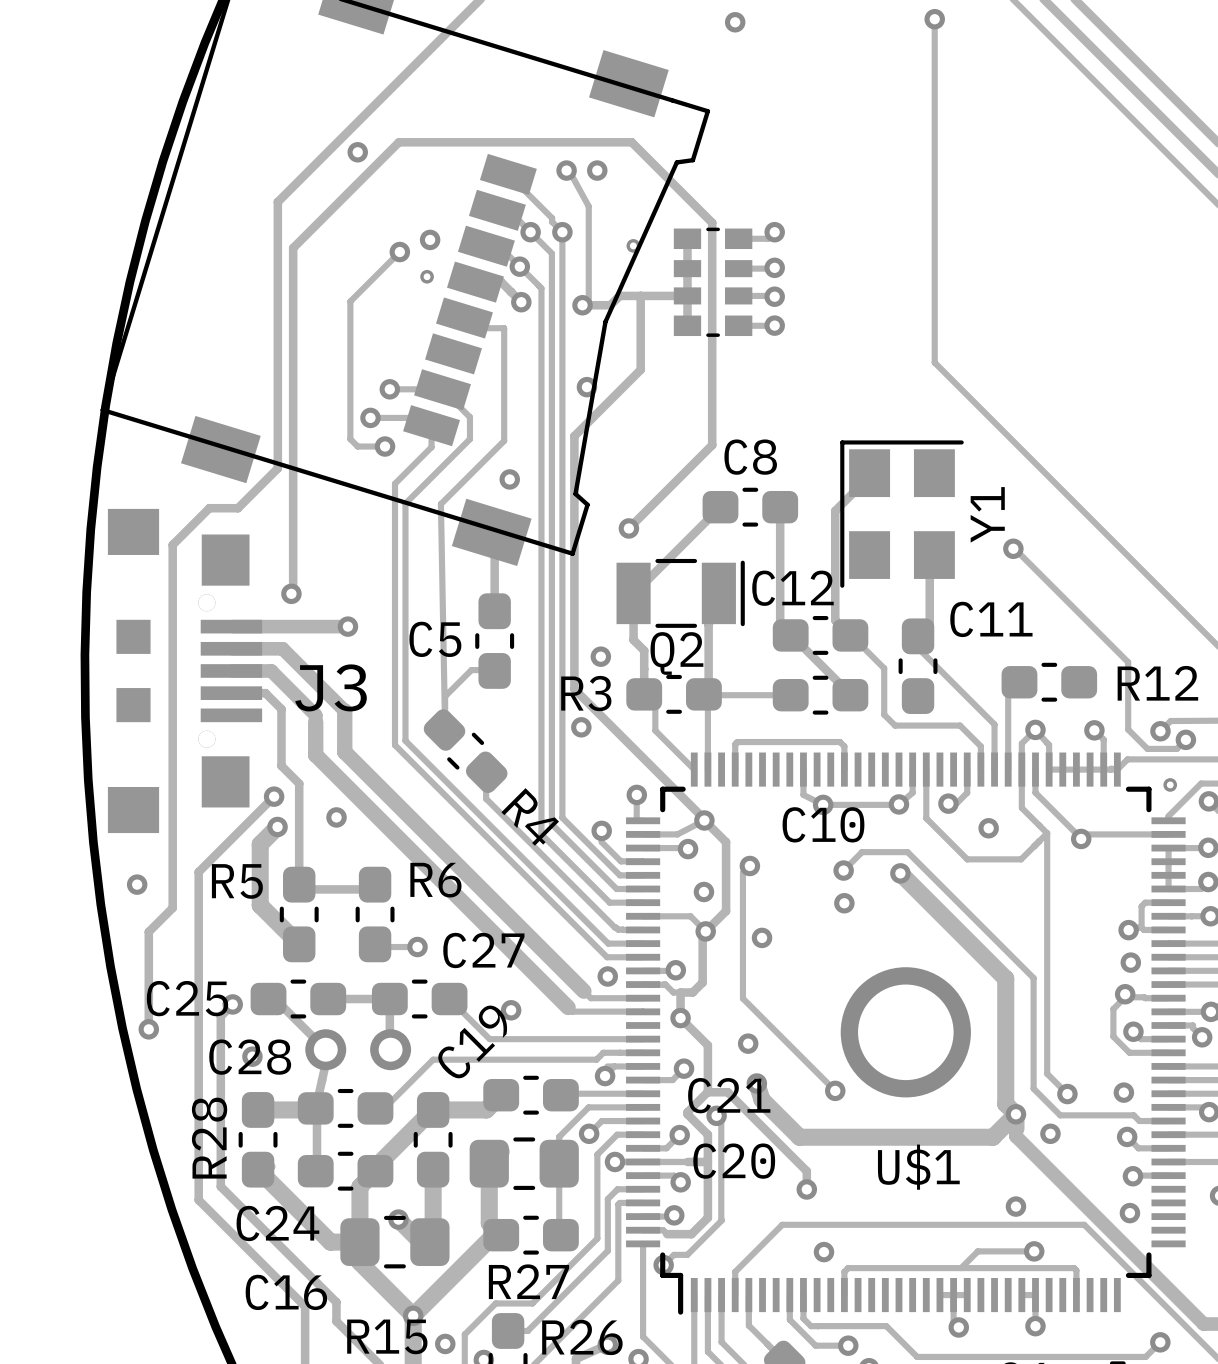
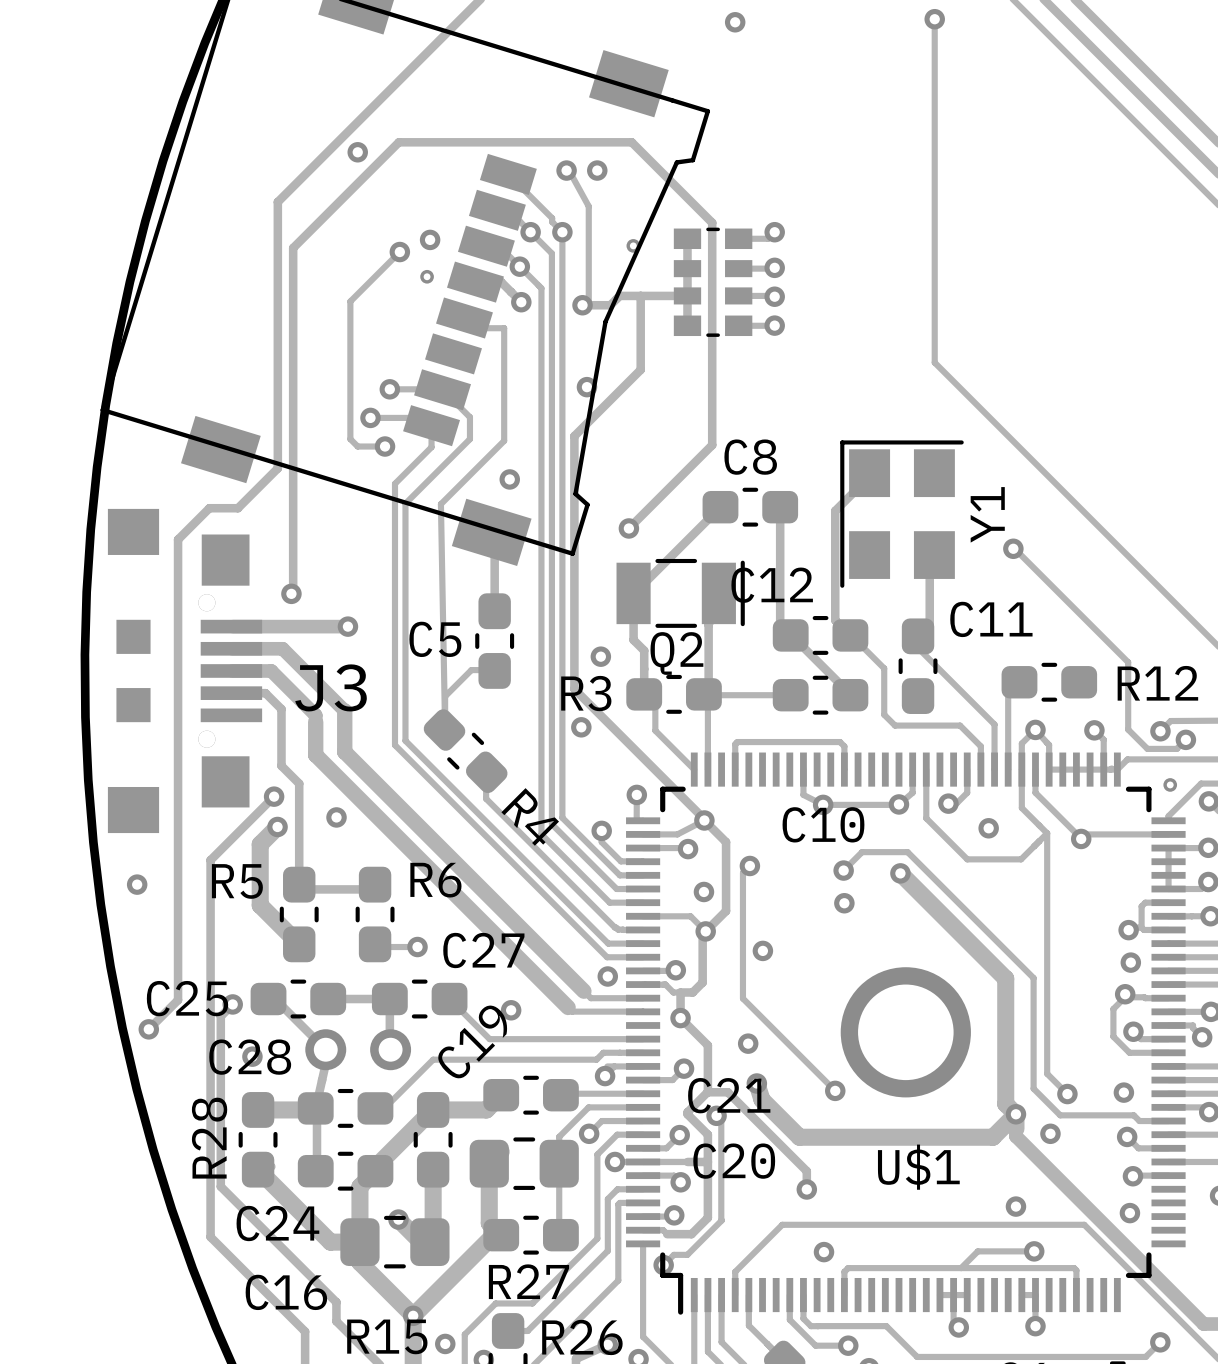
track: (209, 508) (172, 544) (172, 908) (148, 931) (148, 1029) -> (209, 508) (178, 539) (178, 1000) (148, 1029)
C12 name position: C12 (792, 588) -> C12 (772, 585)
track: (210, 860) (198, 872) (198, 1200) (305, 1306) (305, 1331) -> (210, 860) (210, 1237) (305, 1331)
via position: (762, 937) -> (762, 950)

